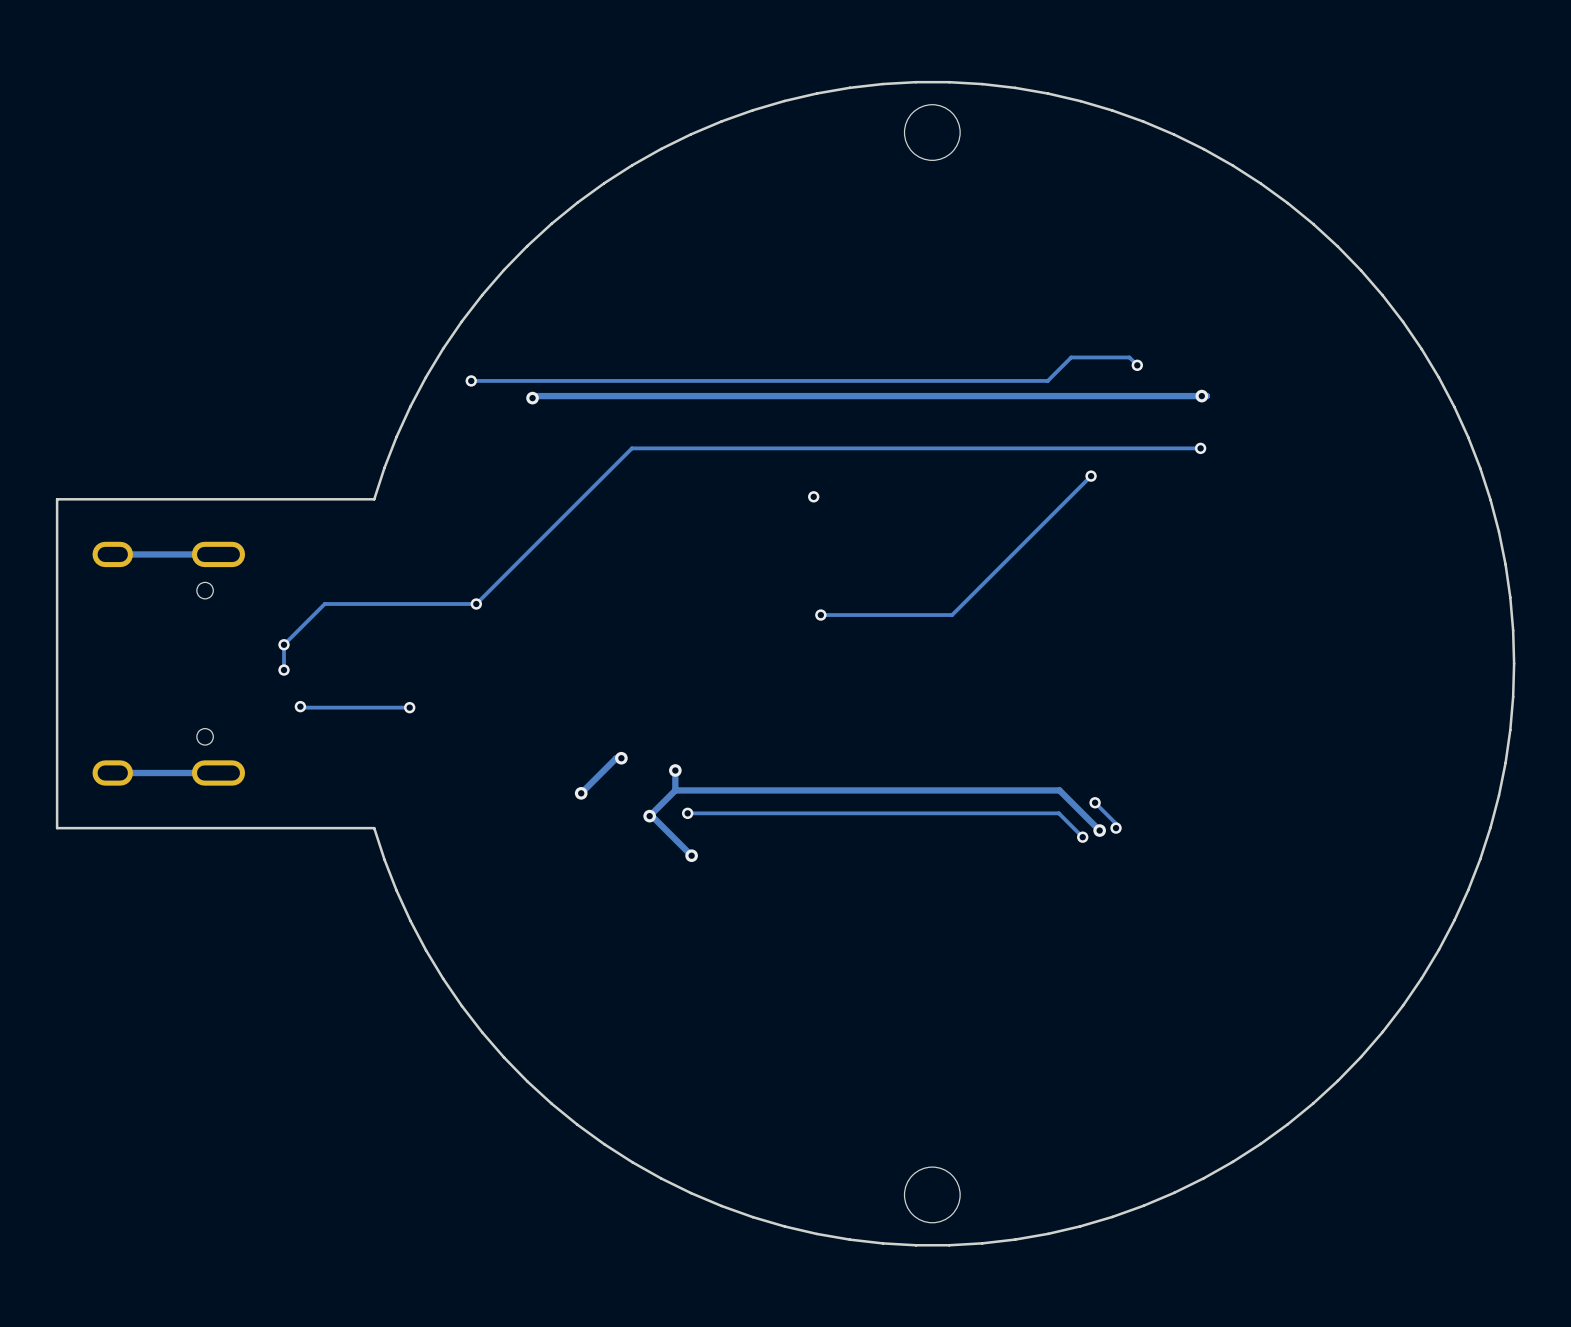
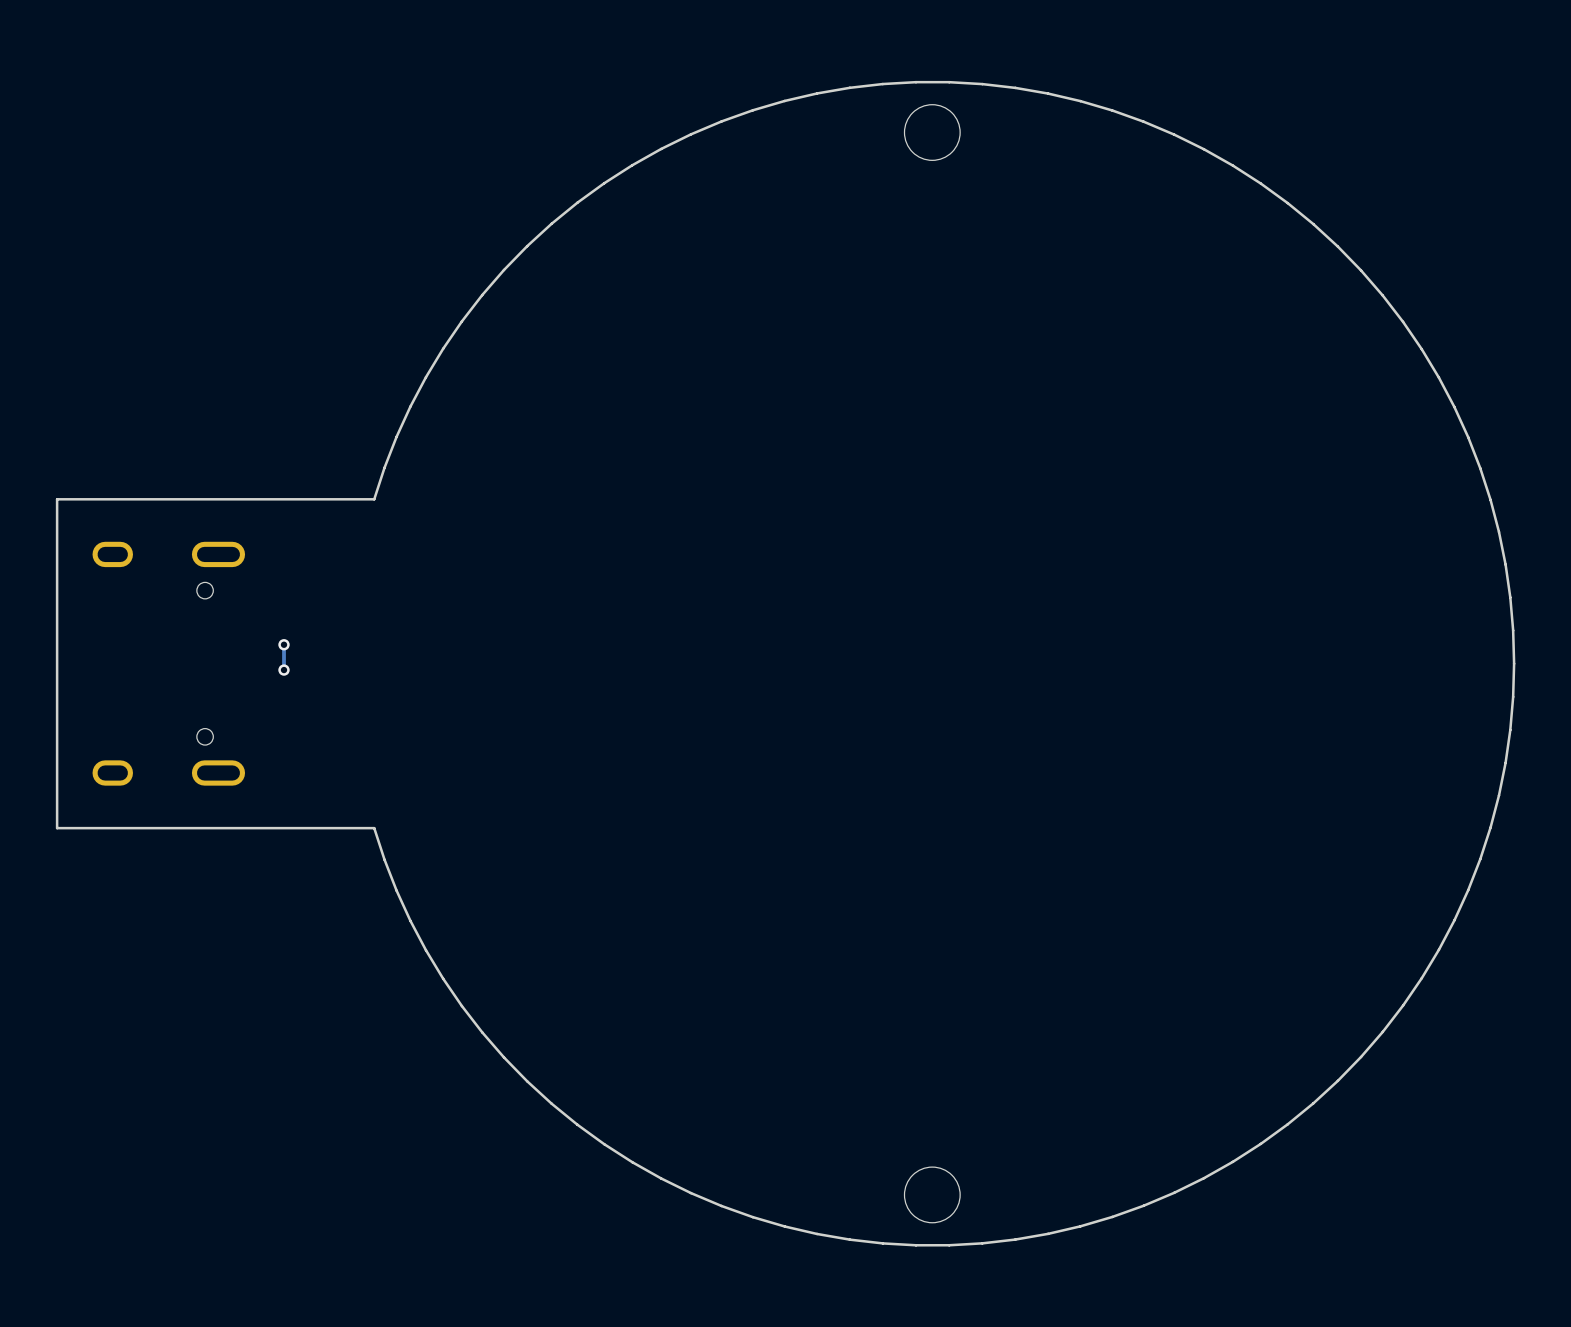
track: (1137, 365) (1129, 357) (1071, 357) (1047, 380) (471, 380) -> none
via: (1137, 365) -> none
via: (471, 380) -> none
via: (1201, 396) -> none
track: (1206, 396) (534, 396) (532, 398) -> none
via: (532, 398) -> none
track: (1200, 448) (631, 448) (476, 603) (324, 603) (284, 644) -> none
via: (1200, 448) -> none
track: (1091, 476) (952, 615) (820, 615) -> none
via: (1091, 476) -> none
via: (813, 496) -> none
track: (218, 554) (112, 554) -> none
via: (476, 603) -> none
via: (820, 615) -> none
track: (300, 706) (409, 707) -> none
via: (300, 706) -> none
via: (409, 707) -> none
track: (621, 758) (616, 758) (581, 793) -> none
via: (621, 758) -> none
track: (675, 770) (675, 790) -> none
via: (675, 770) -> none
track: (218, 773) (112, 773) -> none
track: (675, 790) (650, 814) -> none
track: (675, 790) (1059, 790) (1099, 830) -> none
via: (581, 793) -> none
track: (1095, 802) (1116, 823) (1116, 828) -> none
via: (1095, 802) -> none
track: (687, 813) (1058, 813) (1082, 837) -> none
via: (687, 813) -> none
track: (650, 814) (691, 855) -> none
via: (649, 816) -> none
via: (1116, 828) -> none
via: (1099, 830) -> none
via: (1082, 837) -> none
via: (691, 855) -> none

